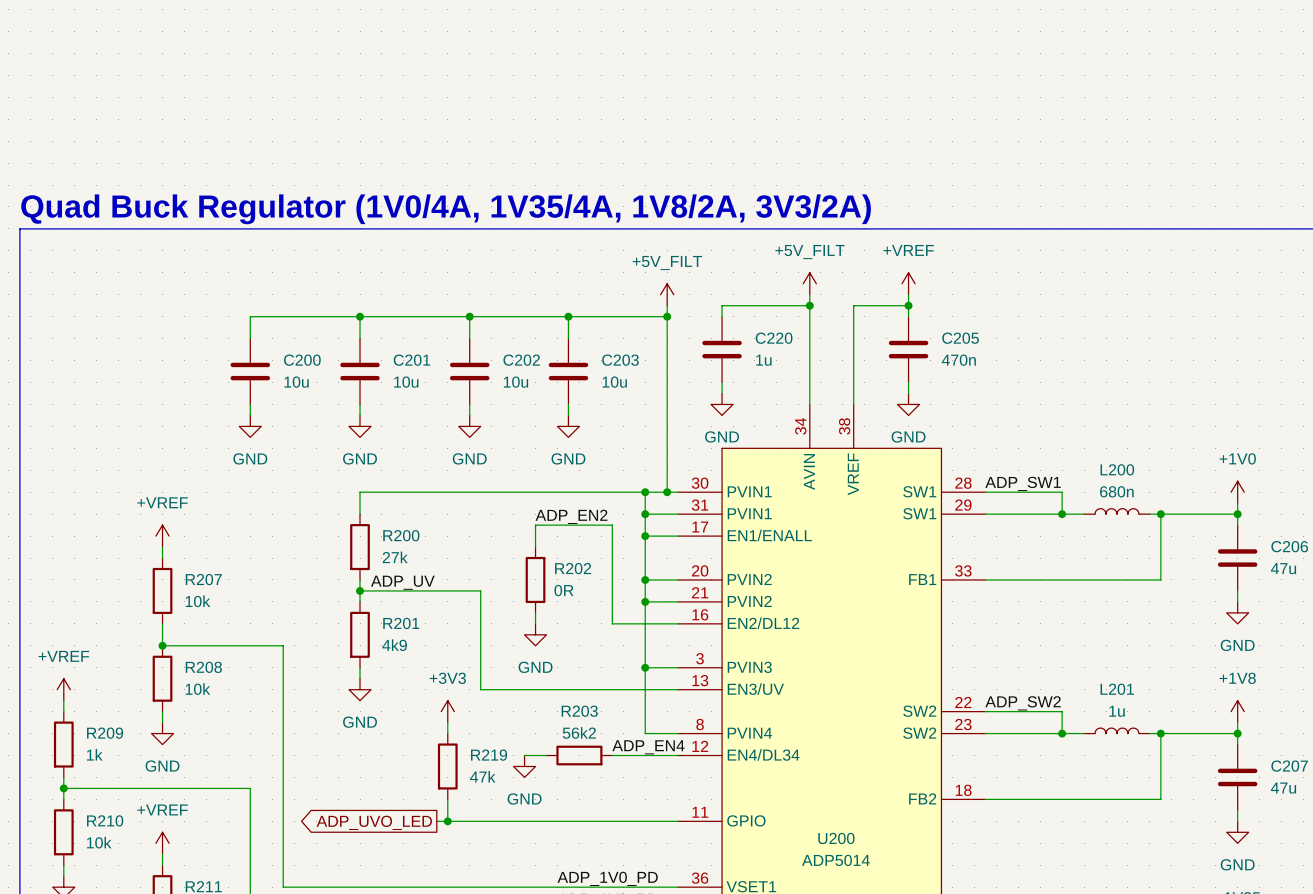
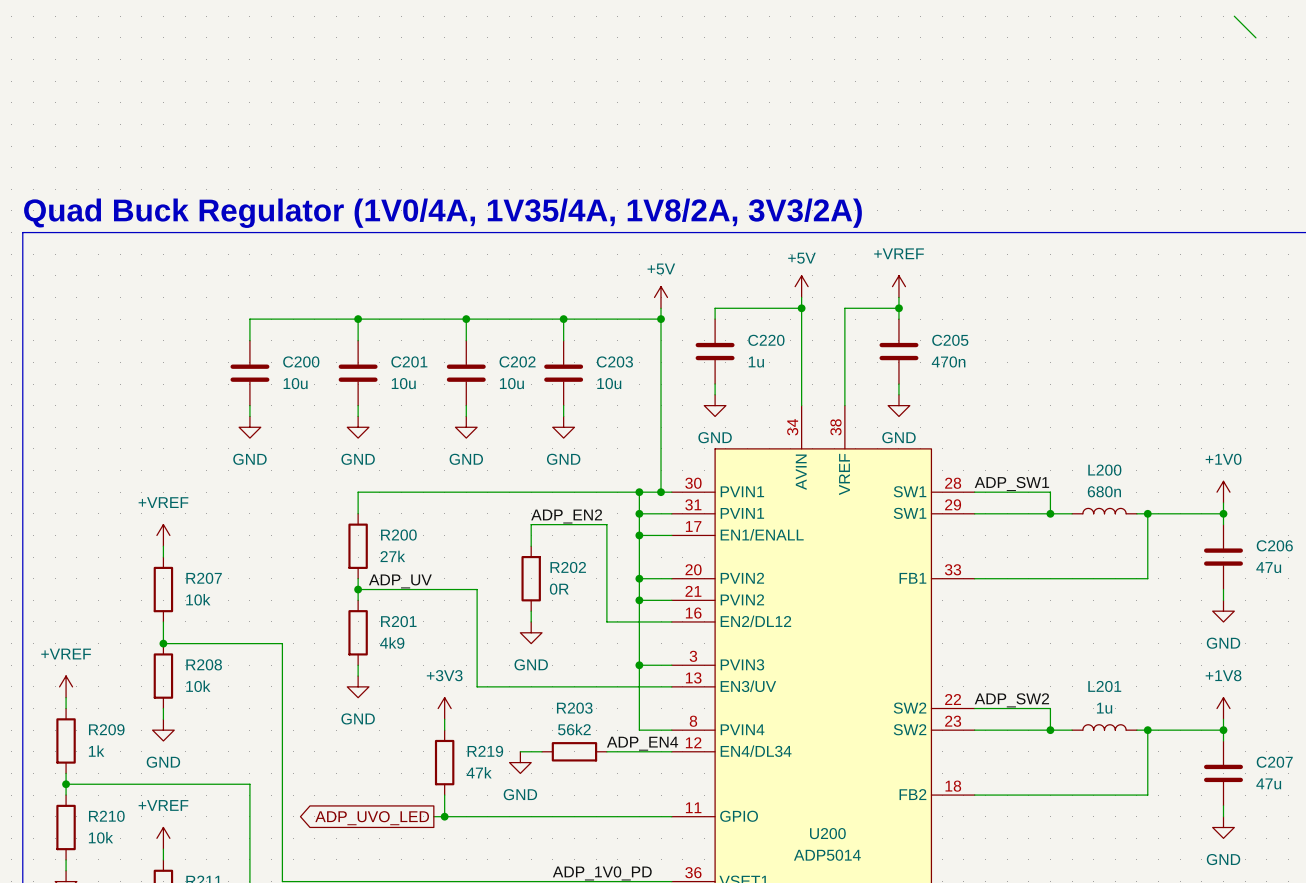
wire: none -> (1234, 16) (1255, 37)
power symbol: +5V_FILT (809, 283) -> +5V (801, 286)
power symbol: +5V_FILT (667, 294) -> +5V (661, 297)

